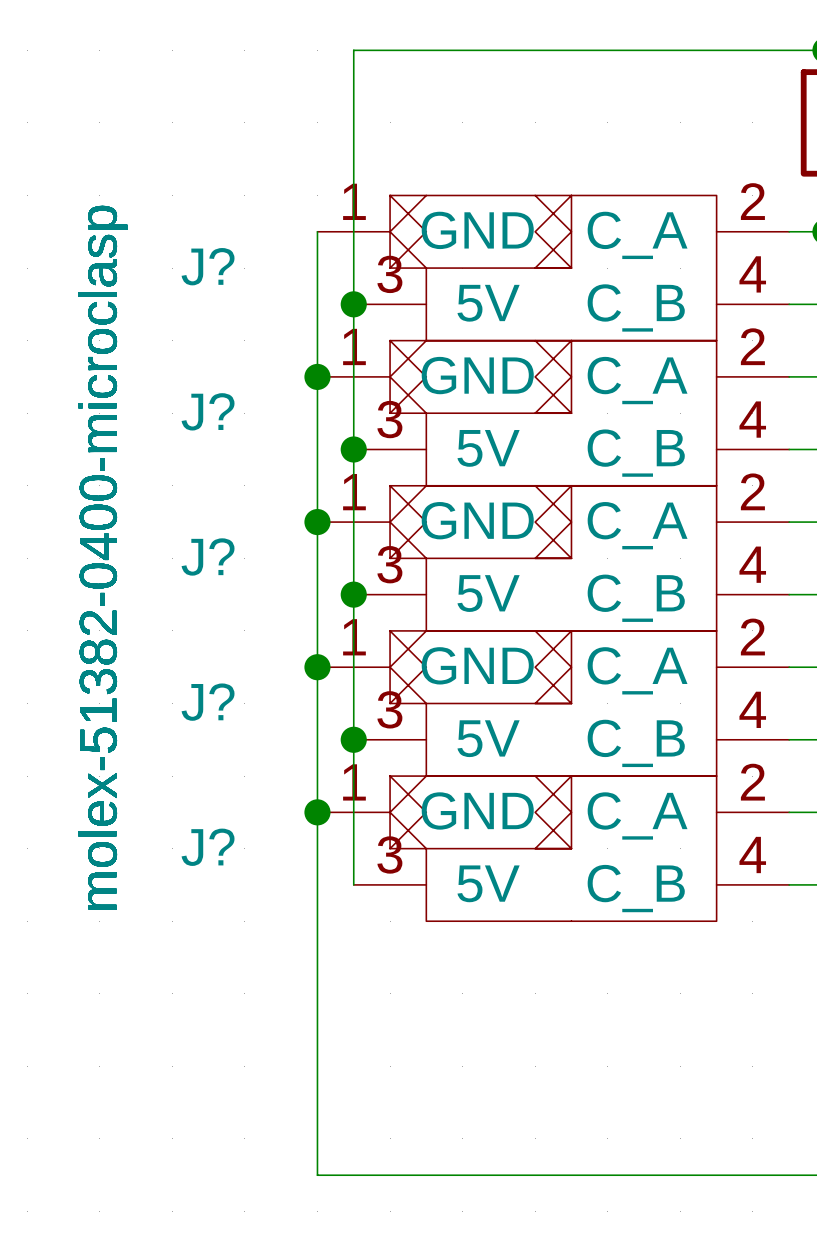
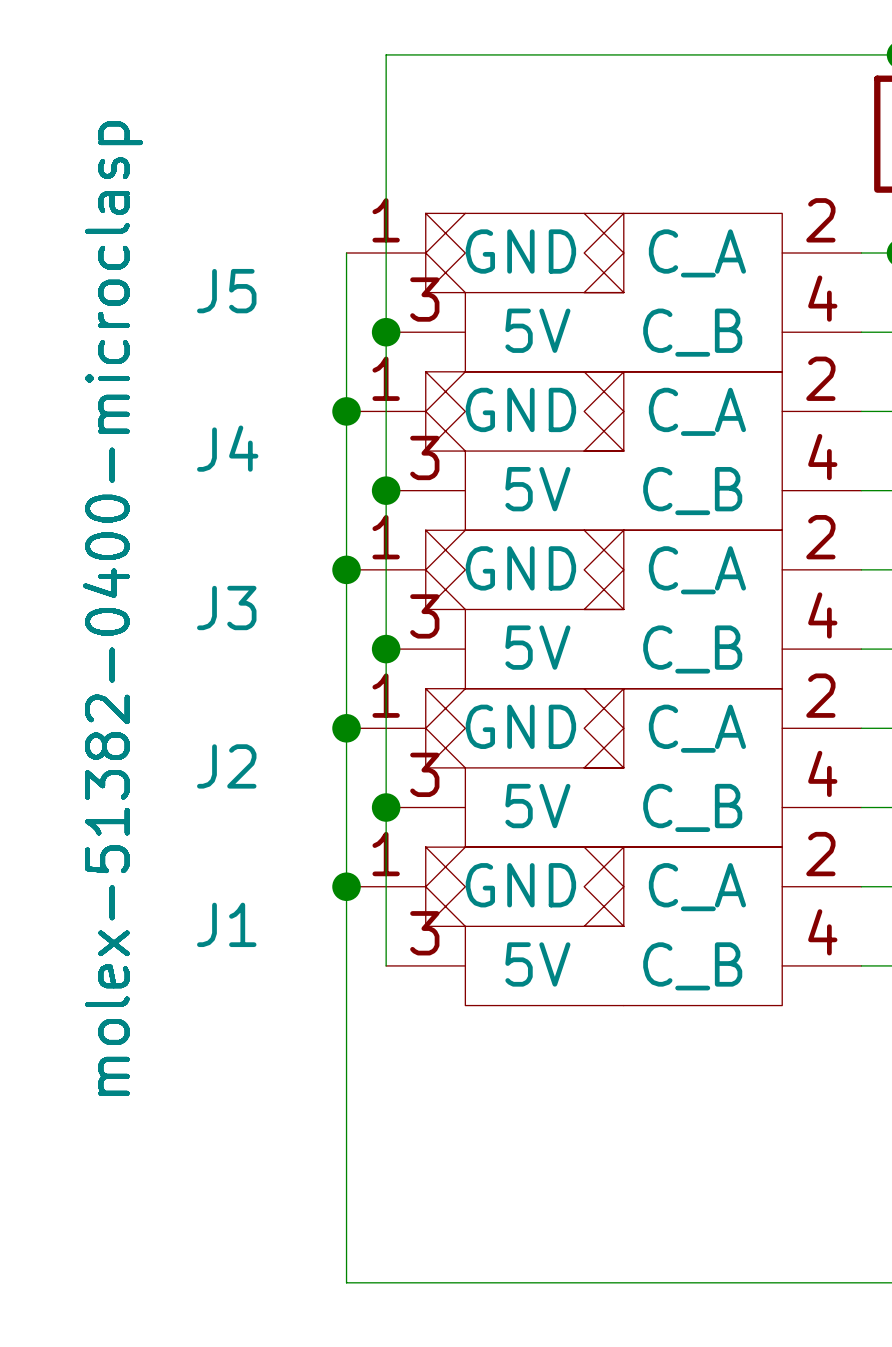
J? name: J? (208, 266) -> J5 (226, 291)
J? name: J? (208, 411) -> J4 (227, 448)
J? name: J? (208, 556) -> J3 (226, 607)
J? name: J? (208, 702) -> J2 (226, 766)
J? name: J? (208, 847) -> J1 (226, 924)

